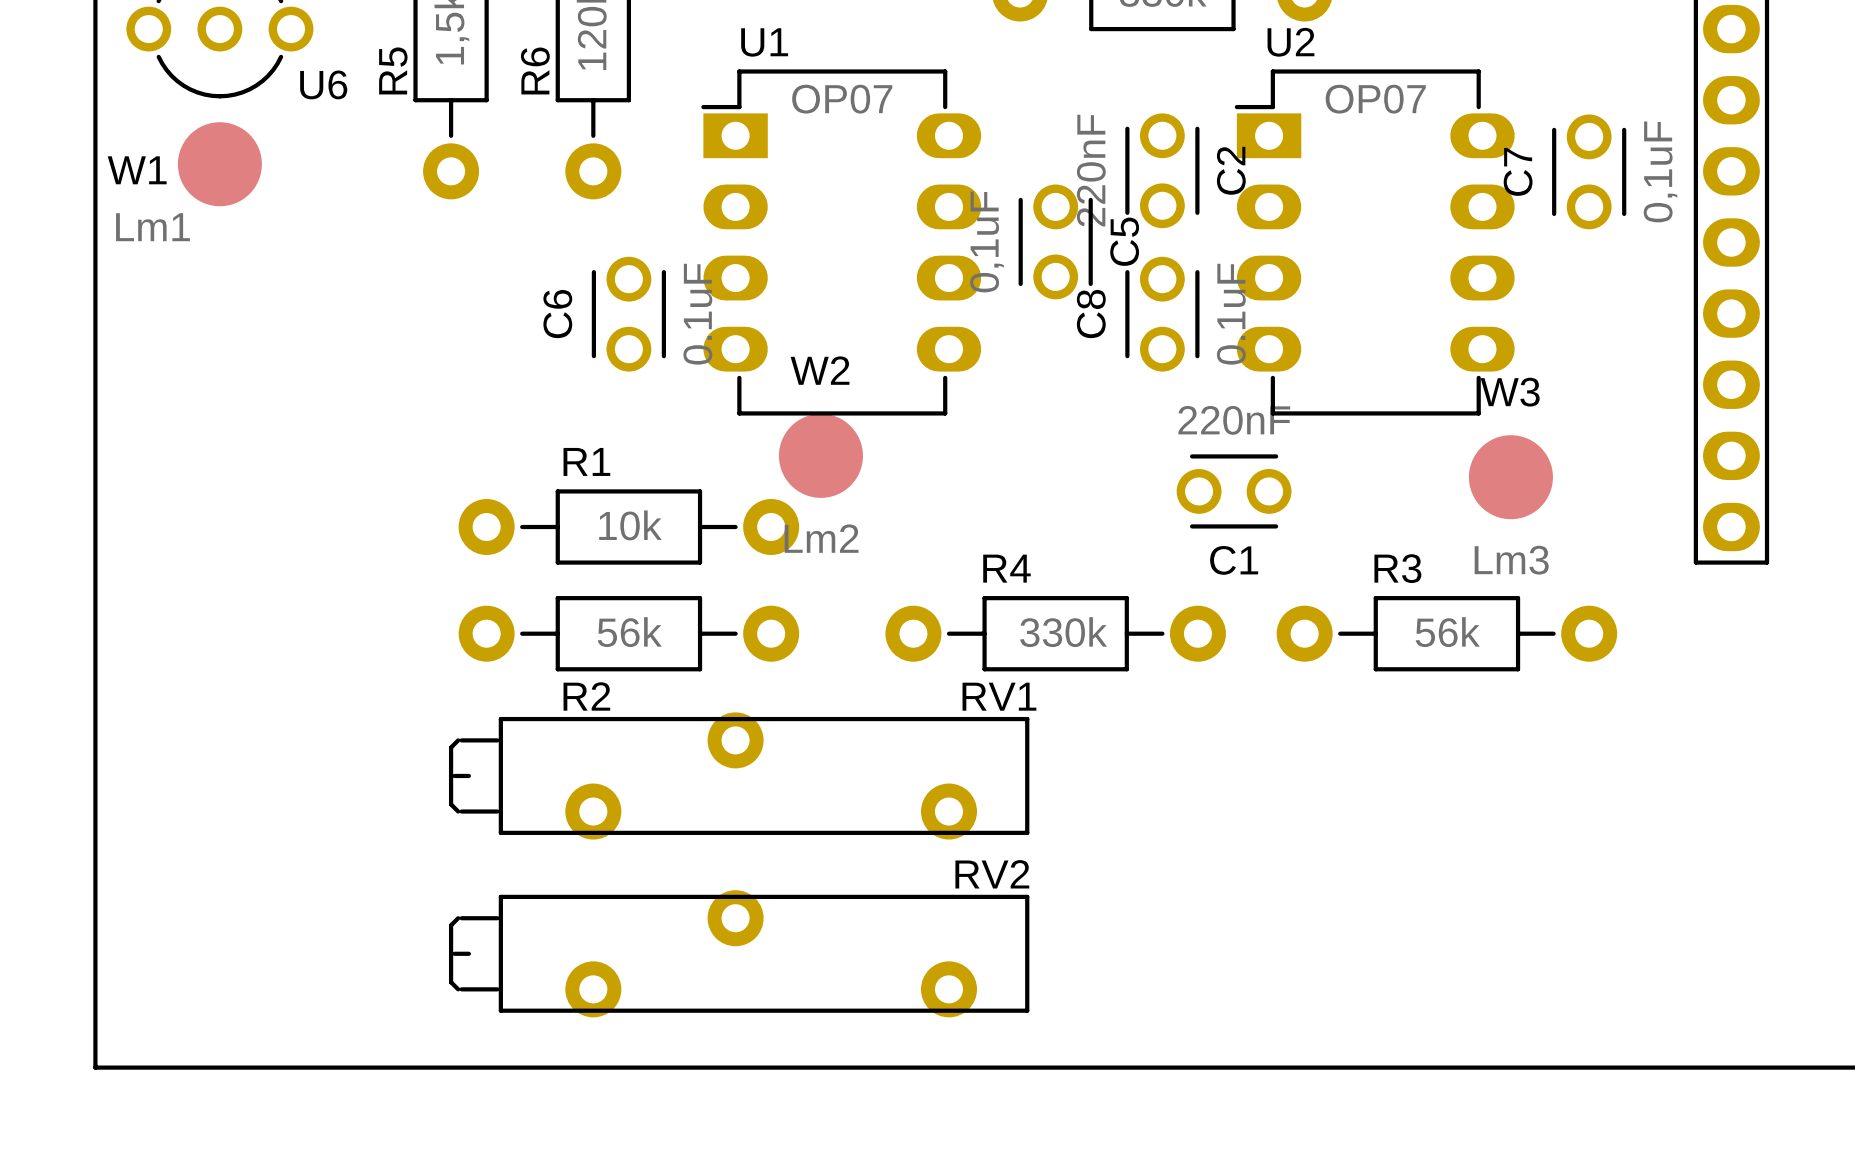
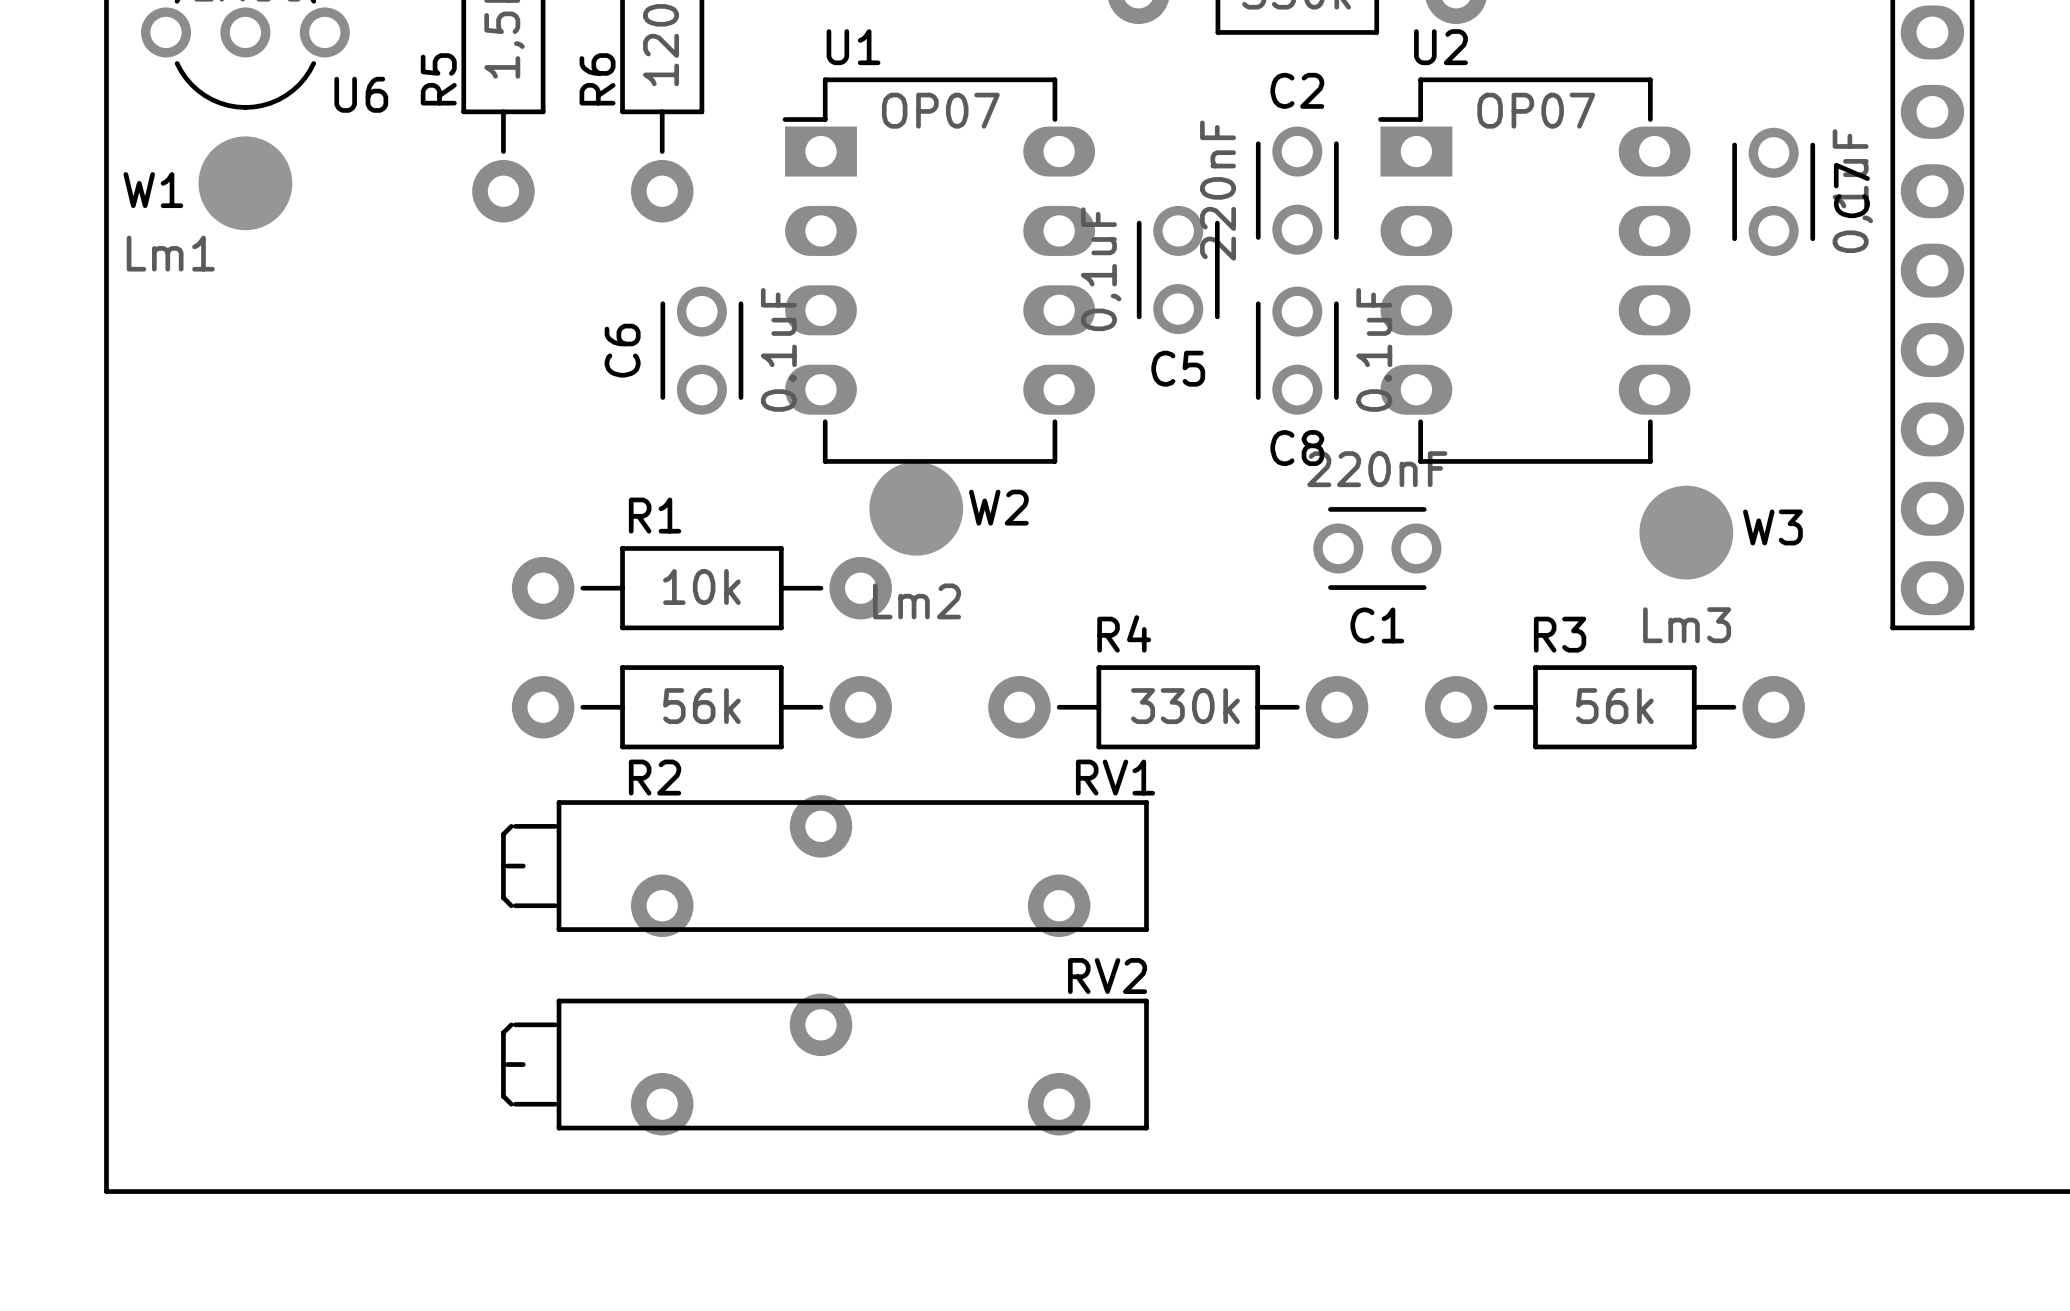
C2 name rotation: 0° (1231, 170) -> 90° clockwise (1297, 90)
C2 name position: C2 (1231, 170) -> C2 (1297, 90)
C7 name position: C7 (1518, 171) -> C7 (1851, 190)
C5 name rotation: 0° (1124, 241) -> 90° clockwise (1178, 368)
C5 name position: C5 (1124, 241) -> C5 (1178, 368)
C8 name rotation: 0° (1091, 314) -> 90° clockwise (1297, 448)
C8 name position: C8 (1091, 314) -> C8 (1297, 448)
W2 name position: W2 (820, 370) -> W2 (998, 507)
W3 name position: W3 (1510, 392) -> W3 (1772, 527)

